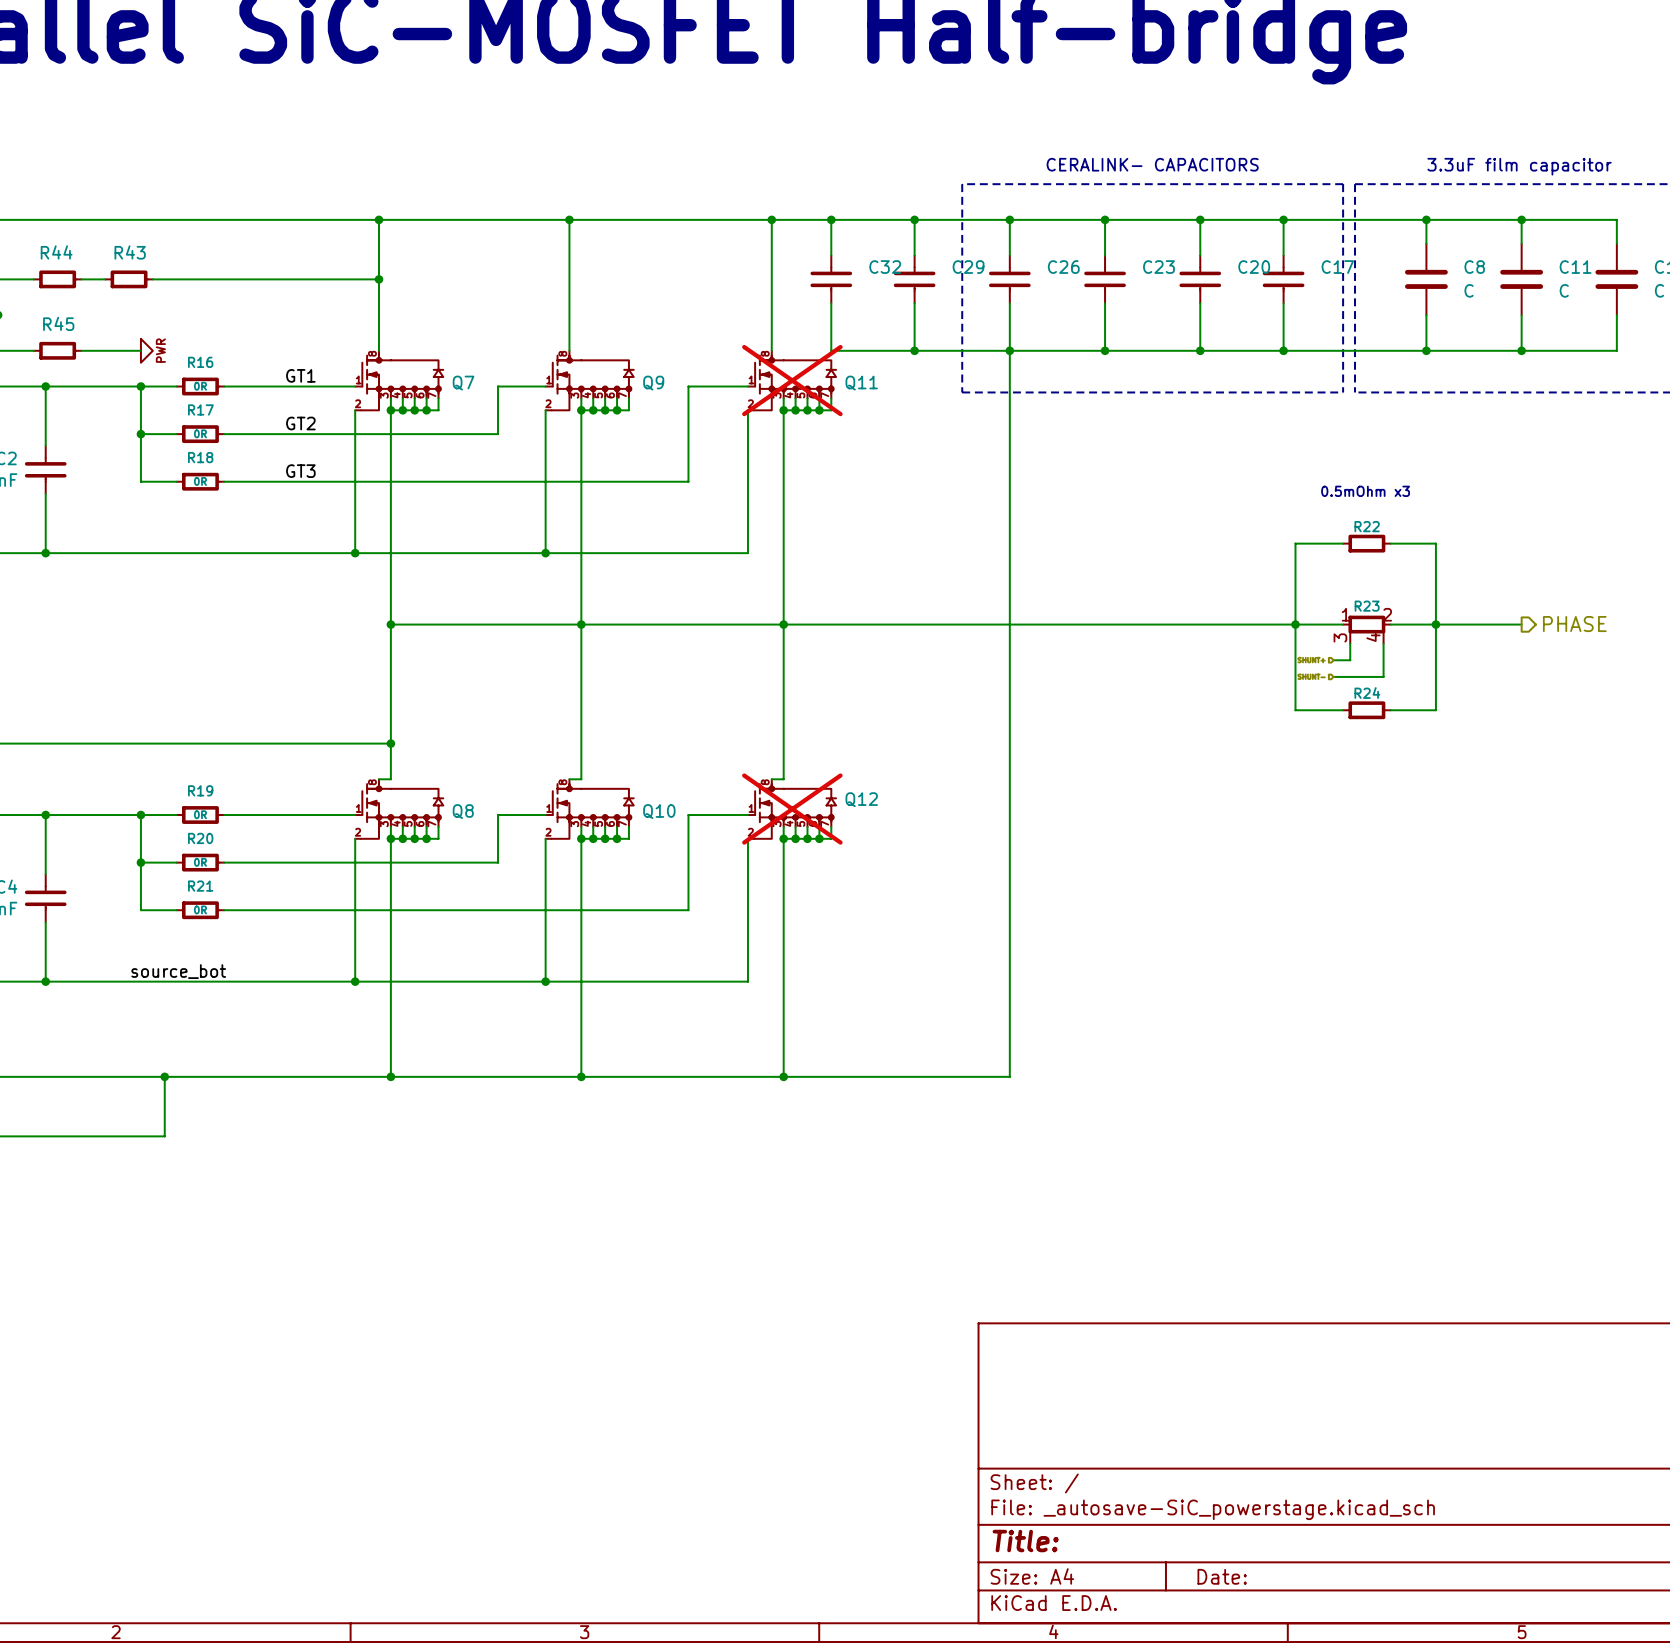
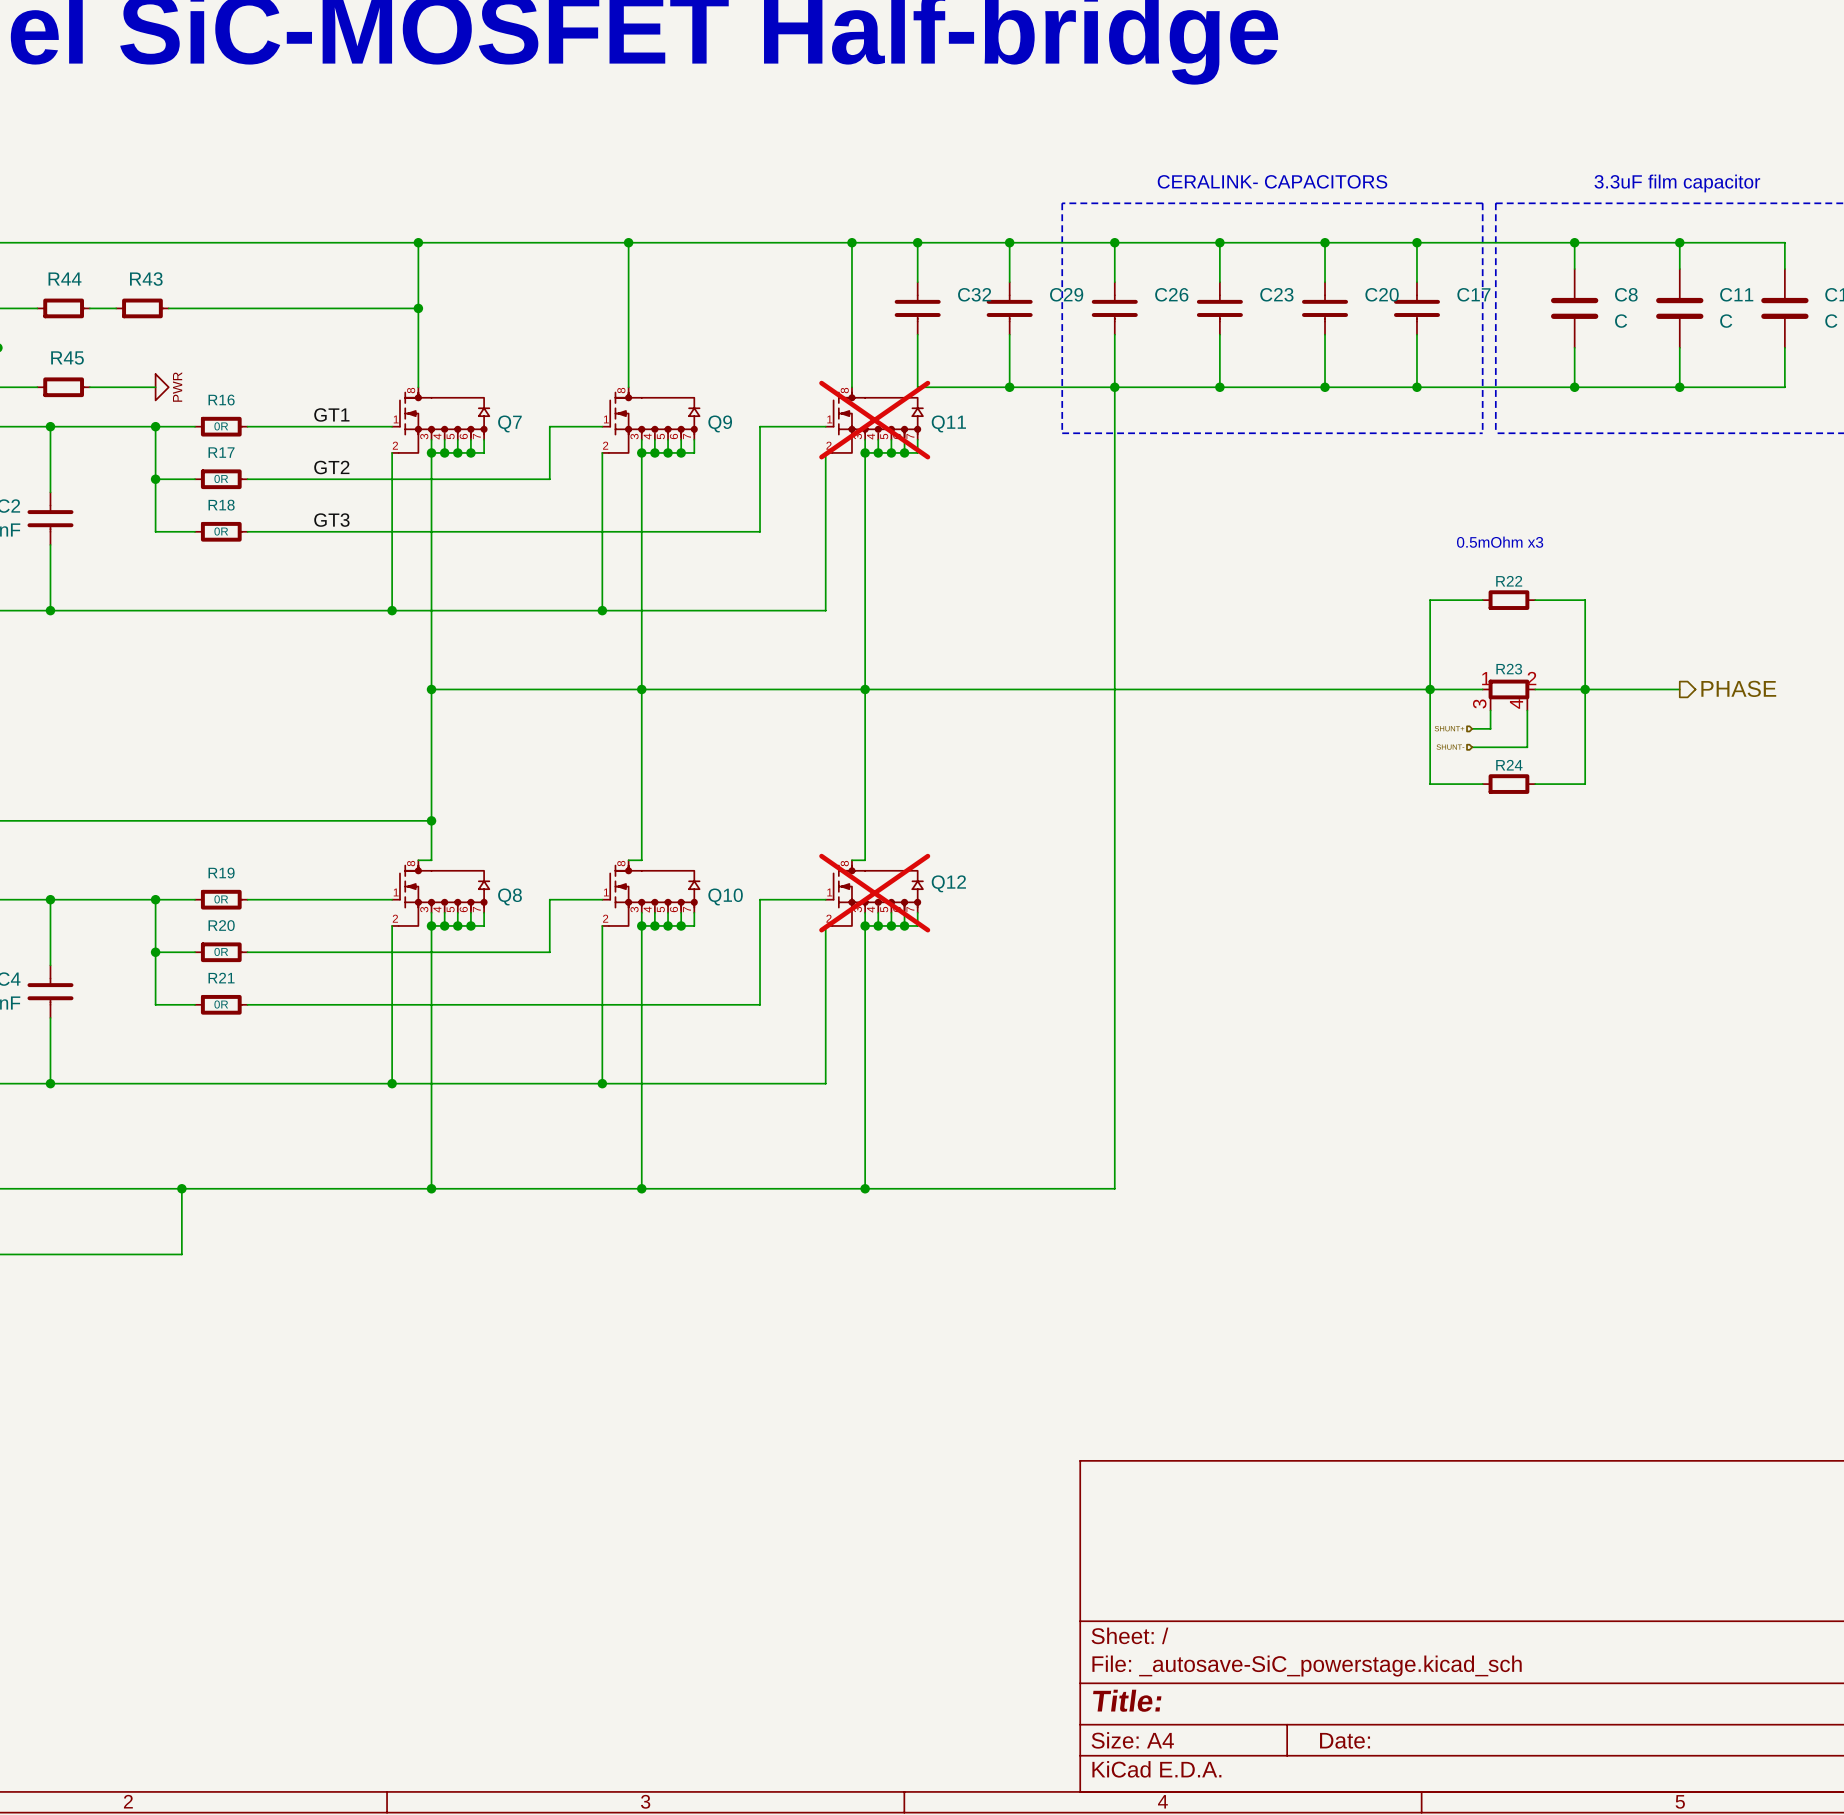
label: source_bot (178, 971) -> none

